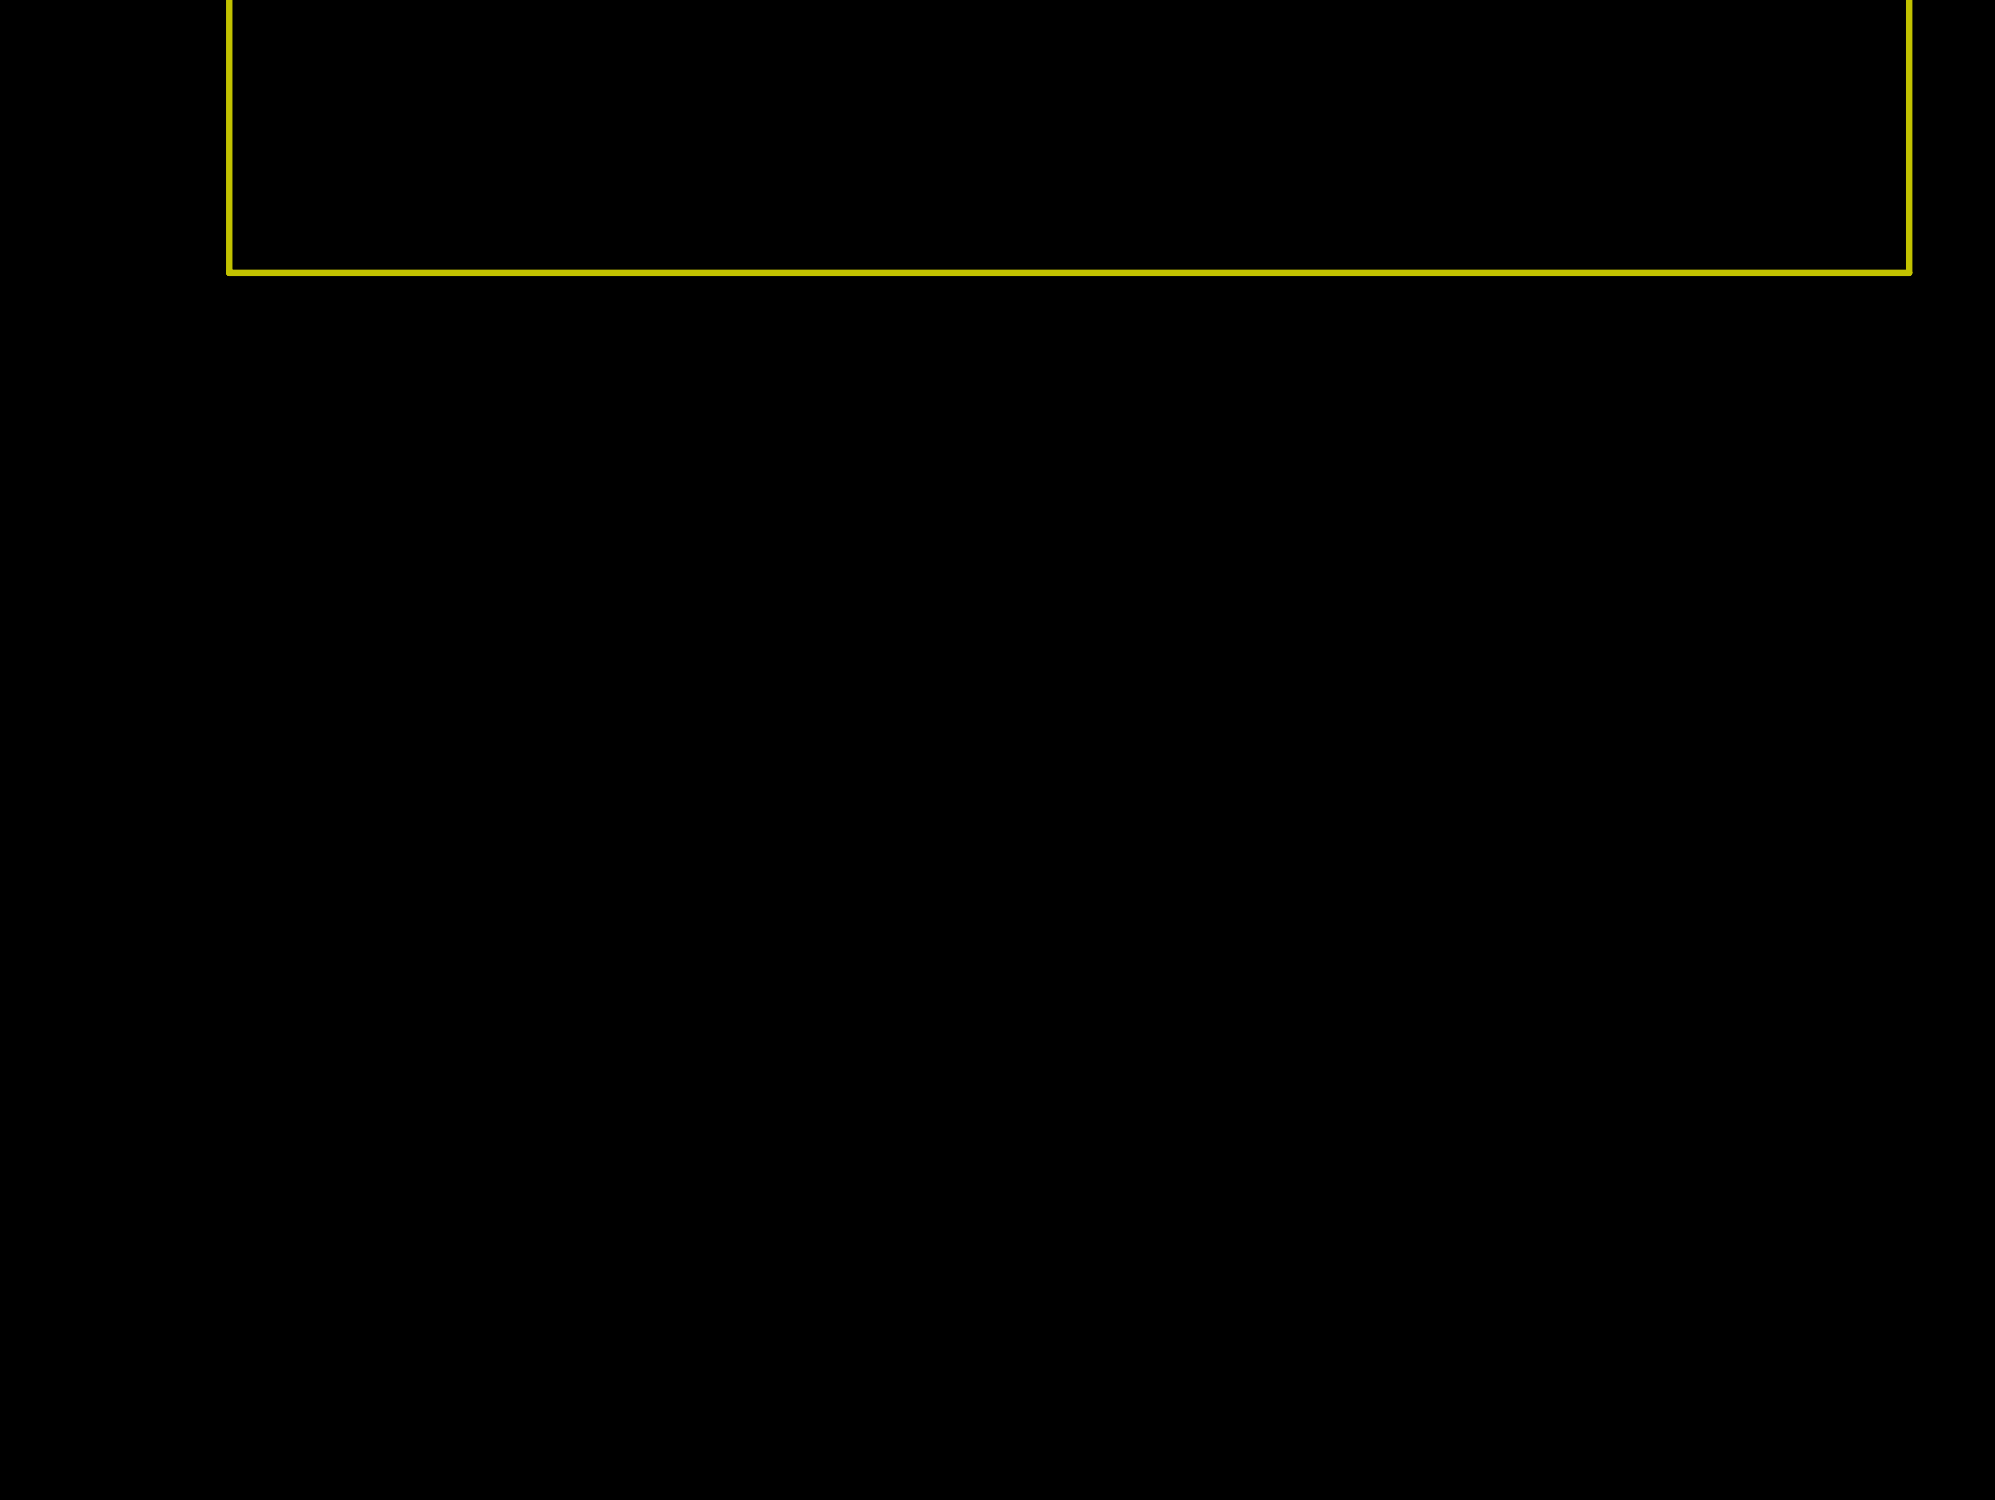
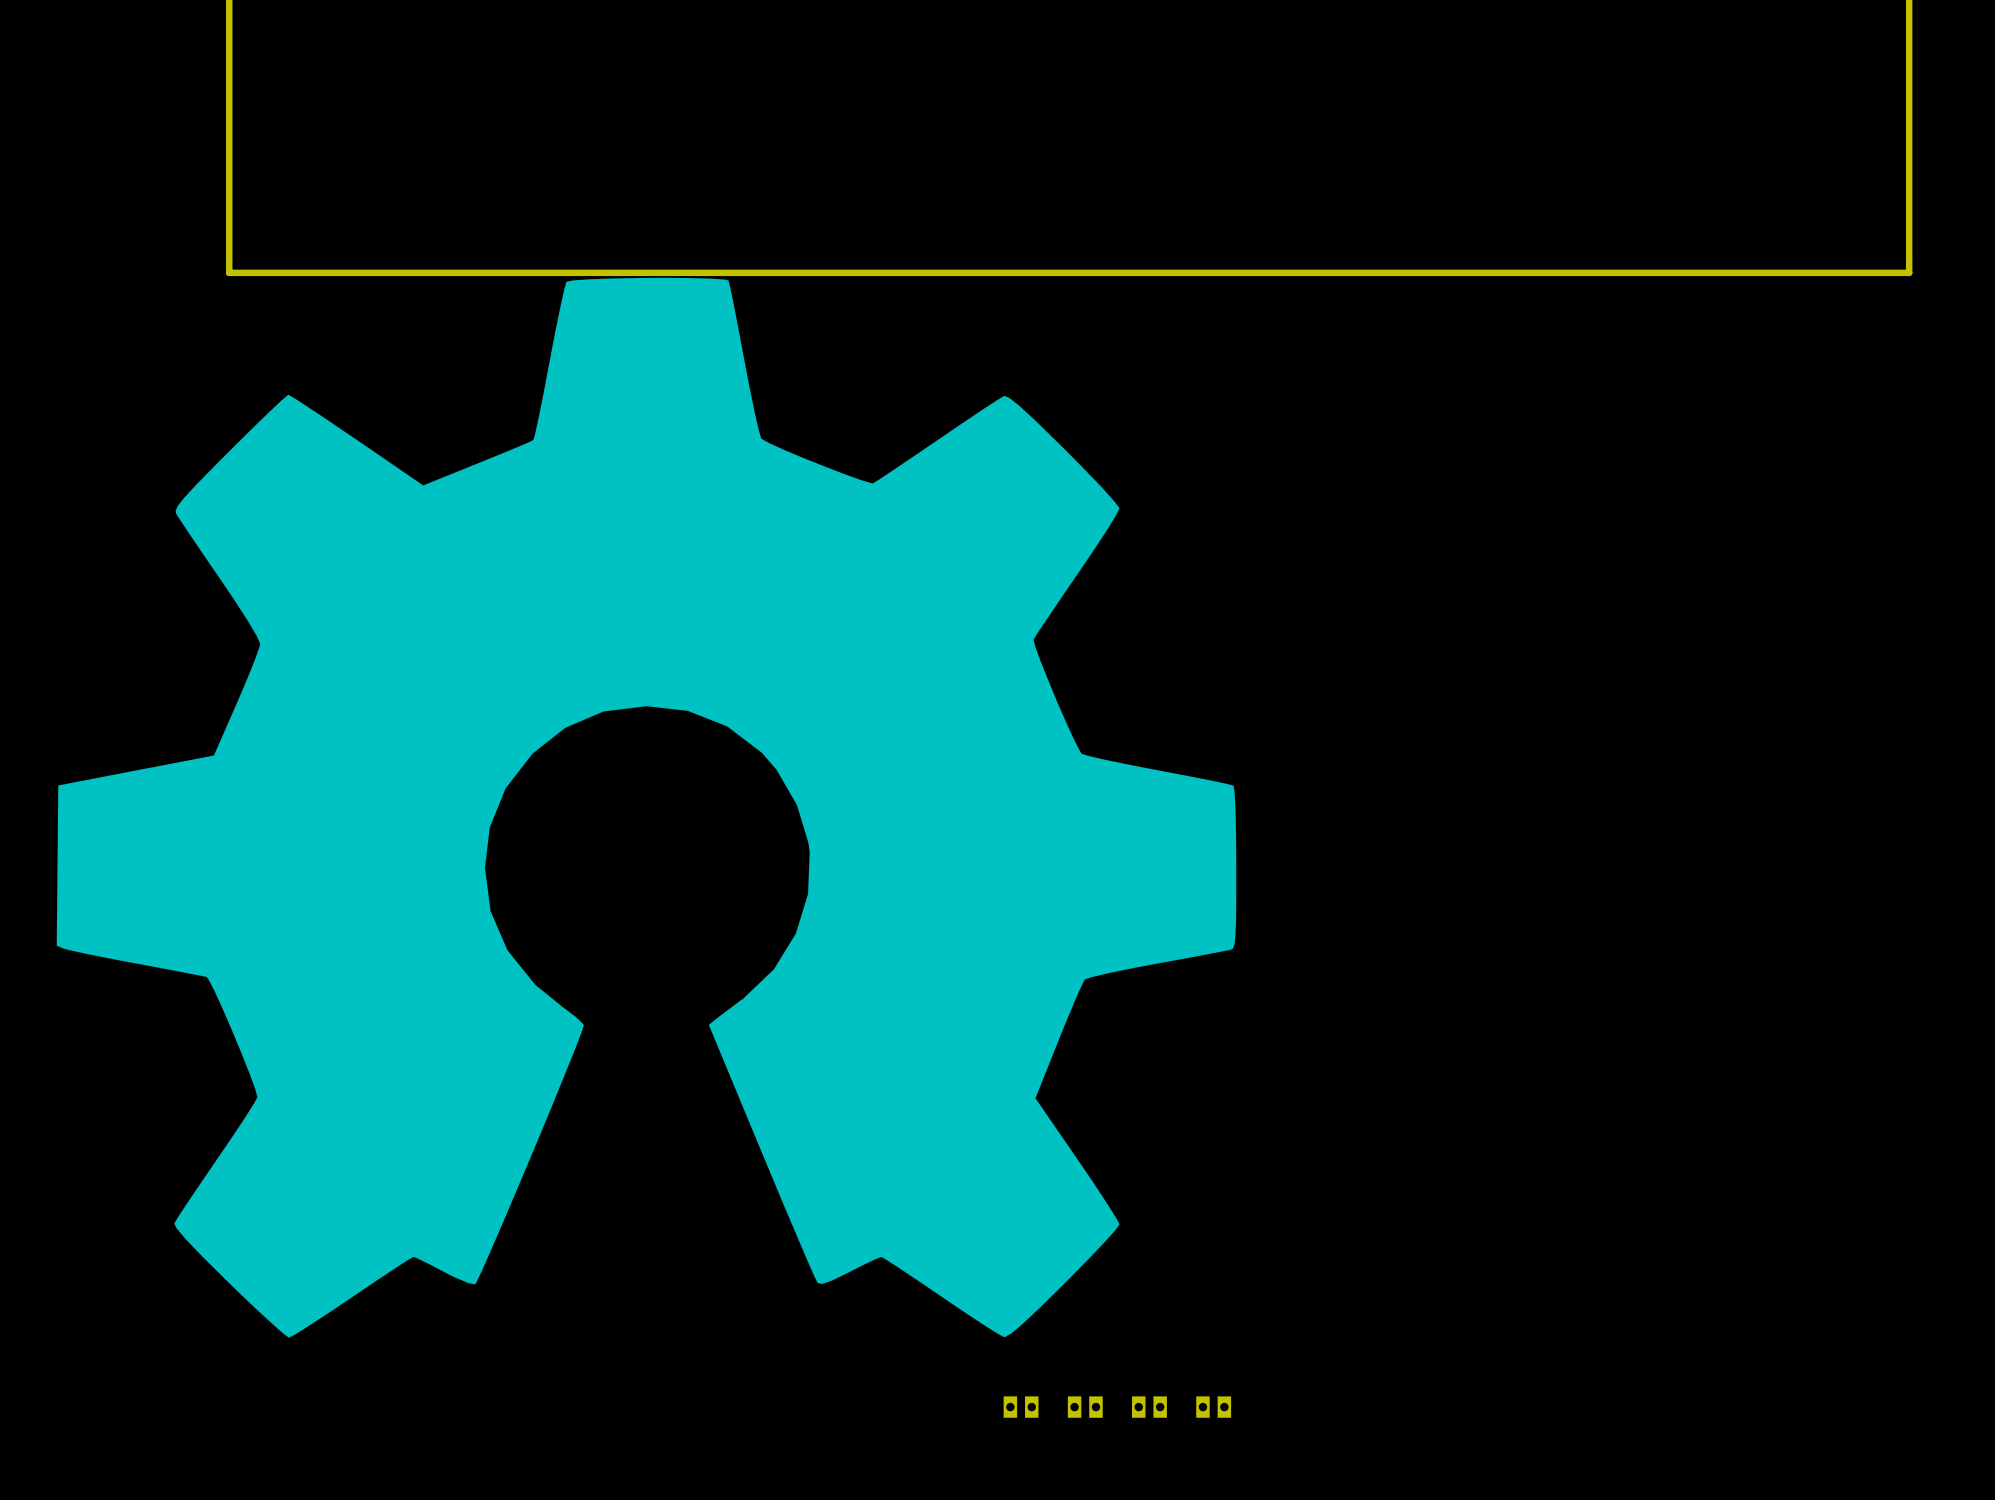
drawing: none -> [56, 277, 1237, 1338]
part: none -> (1053, 1407)
part: none -> (1181, 1407)

